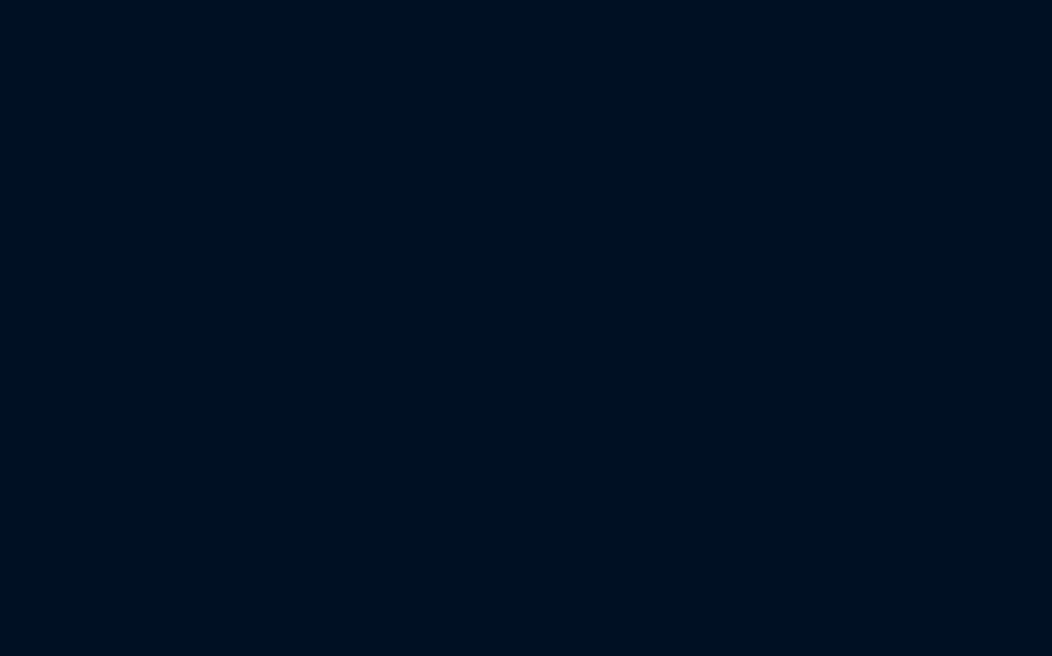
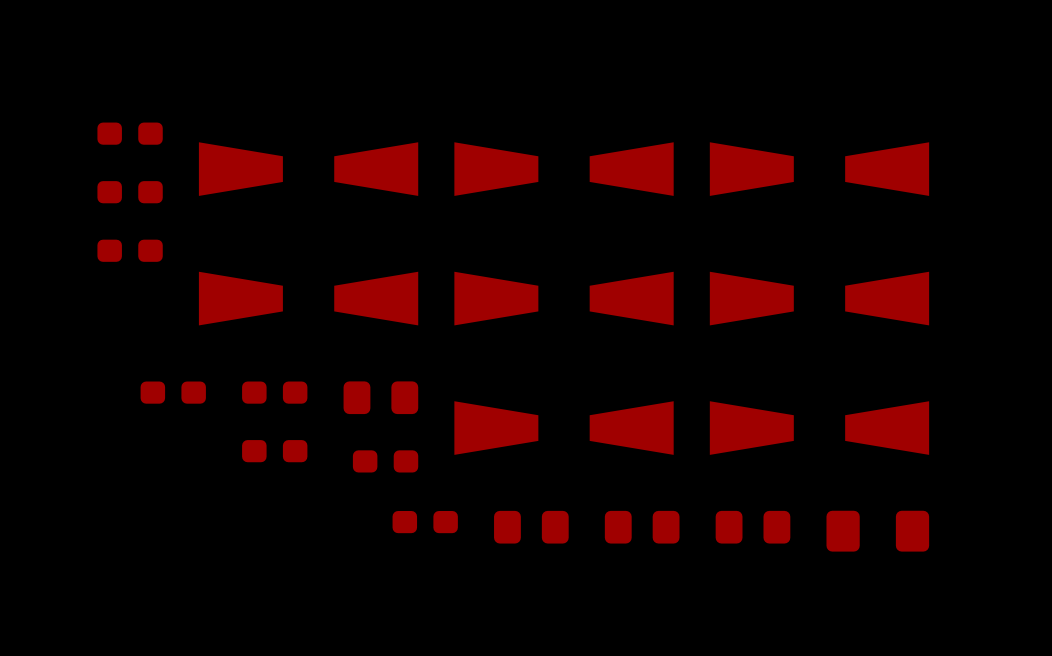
part: none -> (130, 133)
part: none -> (308, 169)
part: none -> (564, 169)
part: none -> (819, 169)
part: none -> (130, 192)
part: none -> (130, 250)
part: none -> (308, 298)
part: none -> (564, 298)
part: none -> (819, 298)
part: none -> (173, 392)
part: none -> (274, 392)
part: none -> (380, 397)
part: none -> (564, 428)
part: none -> (819, 428)
part: none -> (274, 451)
part: none -> (385, 461)
part: none -> (425, 522)
part: none -> (531, 527)
part: none -> (642, 527)
part: none -> (752, 527)
part: none -> (877, 531)

